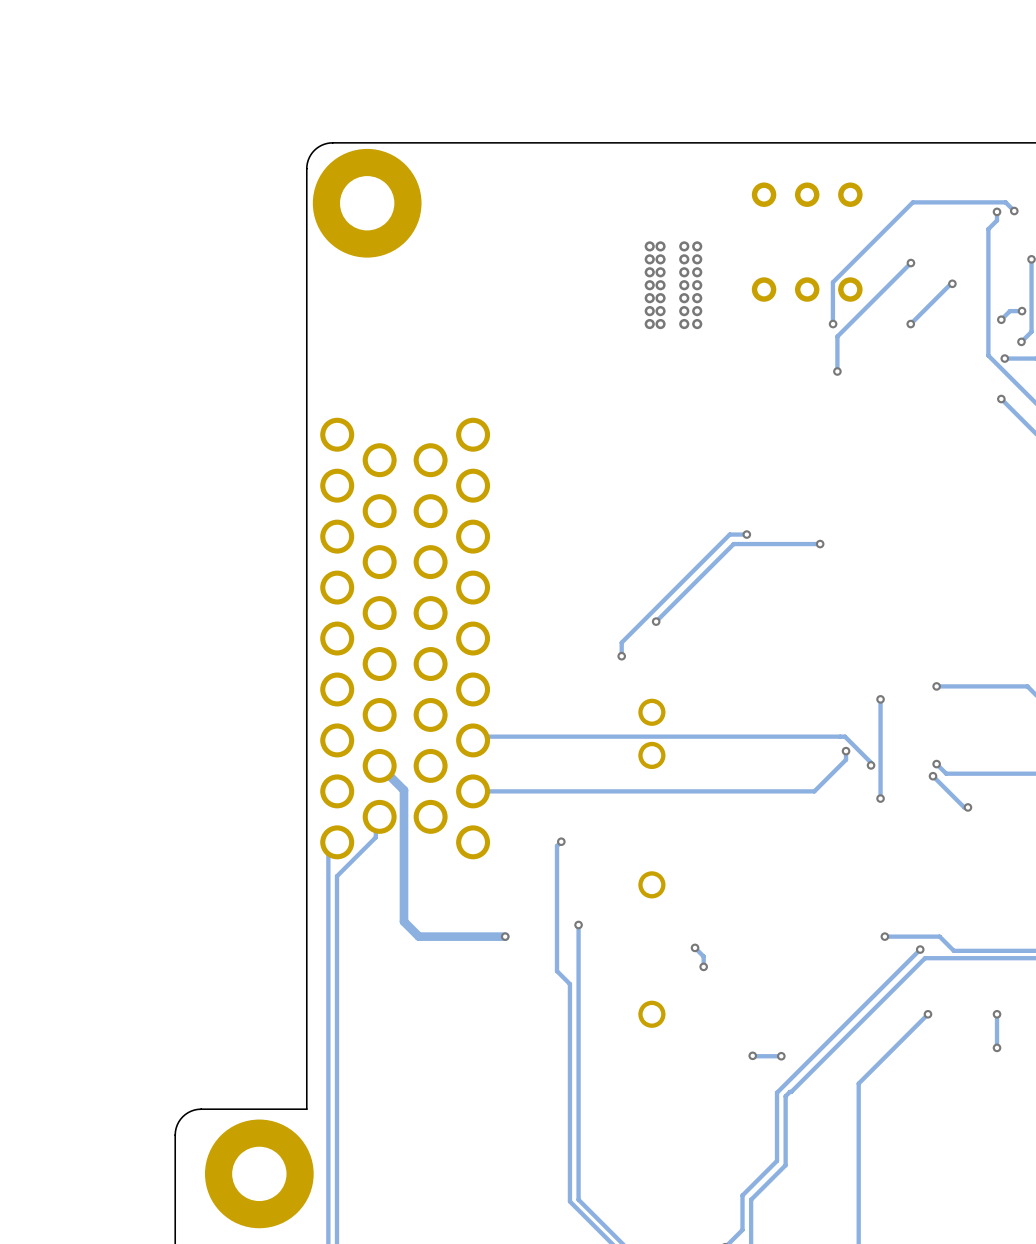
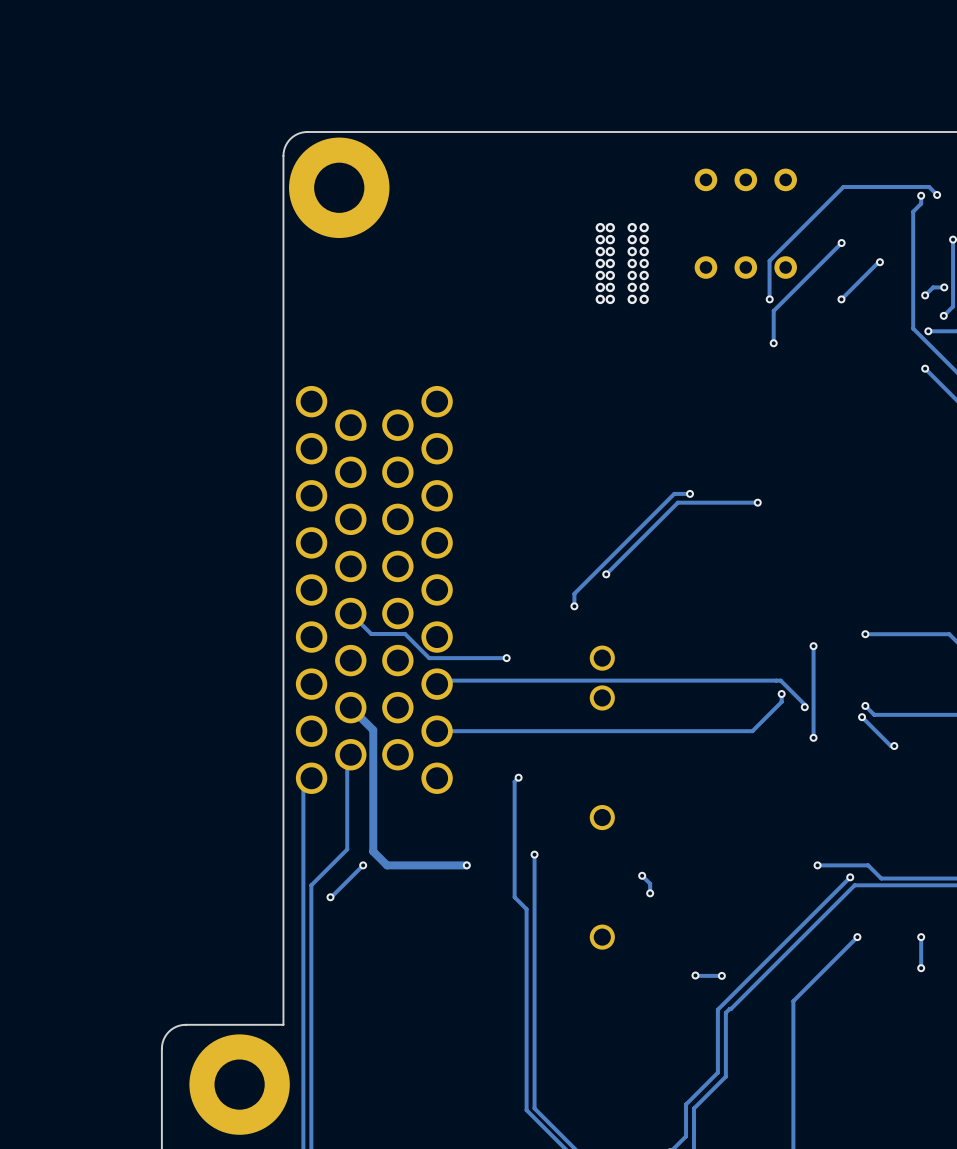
track: none -> (350, 613) (371, 633) (405, 633) (429, 658) (506, 658)
via: none -> (506, 658)
track: (375, 837) (336, 876) (336, 958) -> (347, 773) (347, 849) (311, 885)
track: none -> (363, 865) (330, 897)
via: none -> (363, 865)
via: none -> (330, 897)

